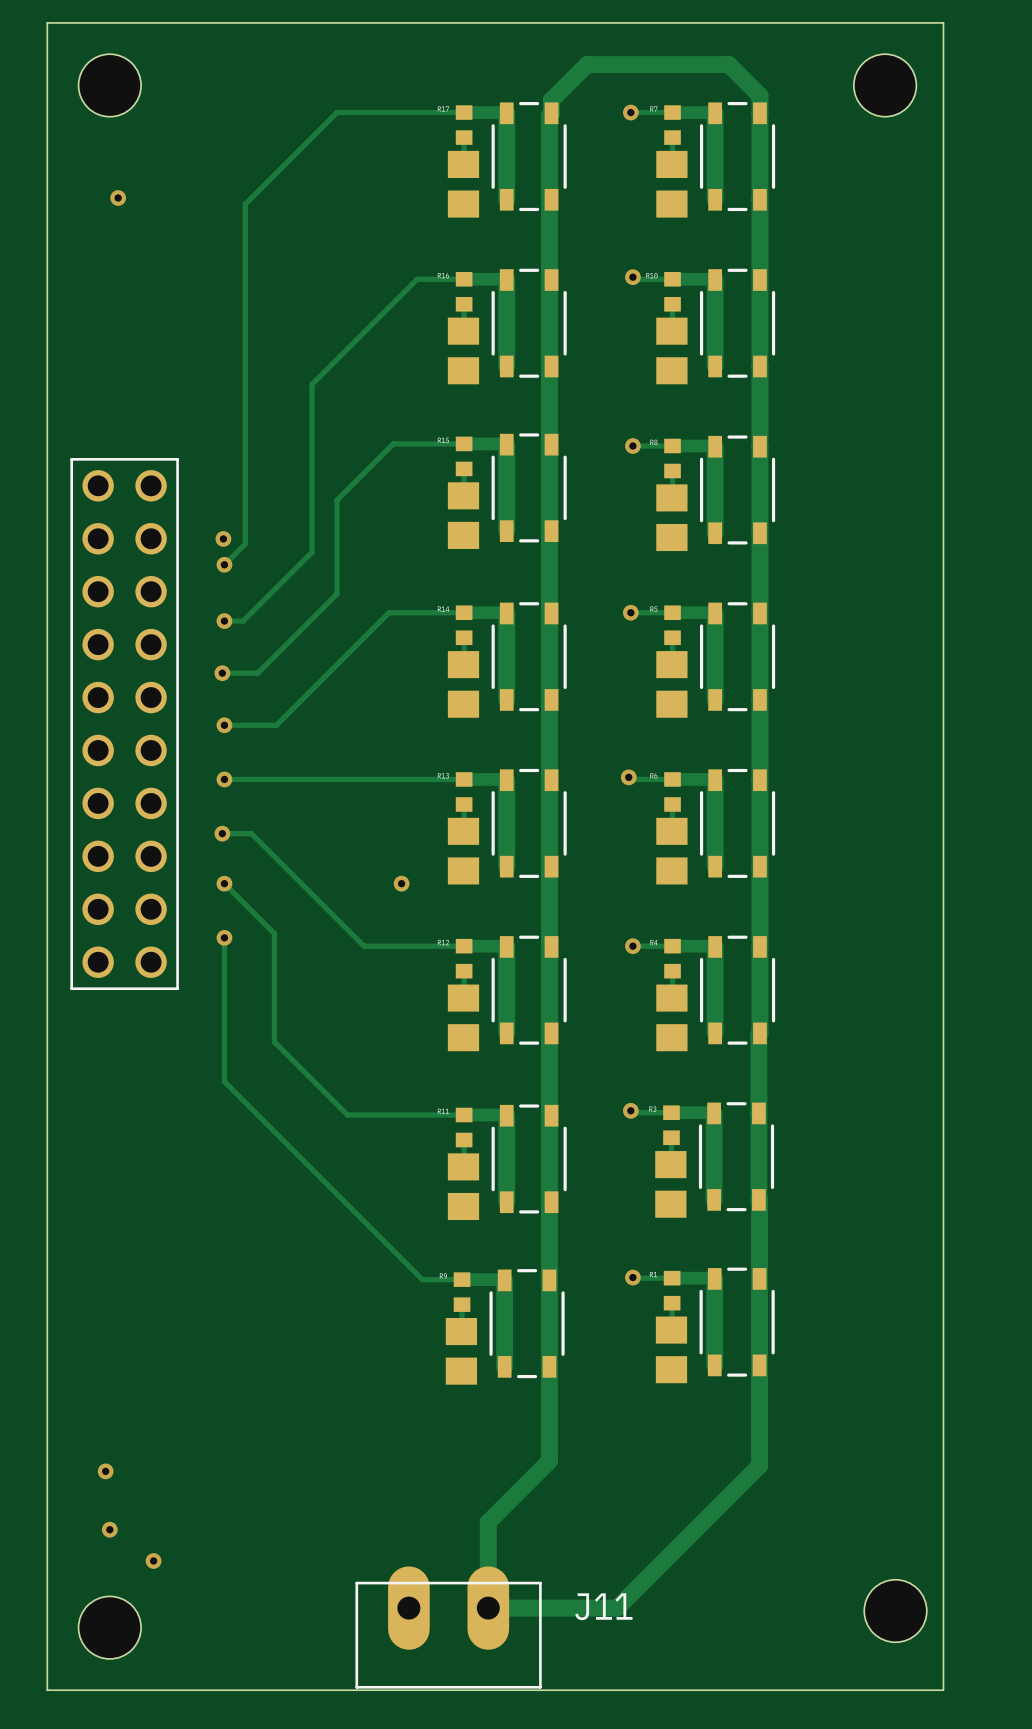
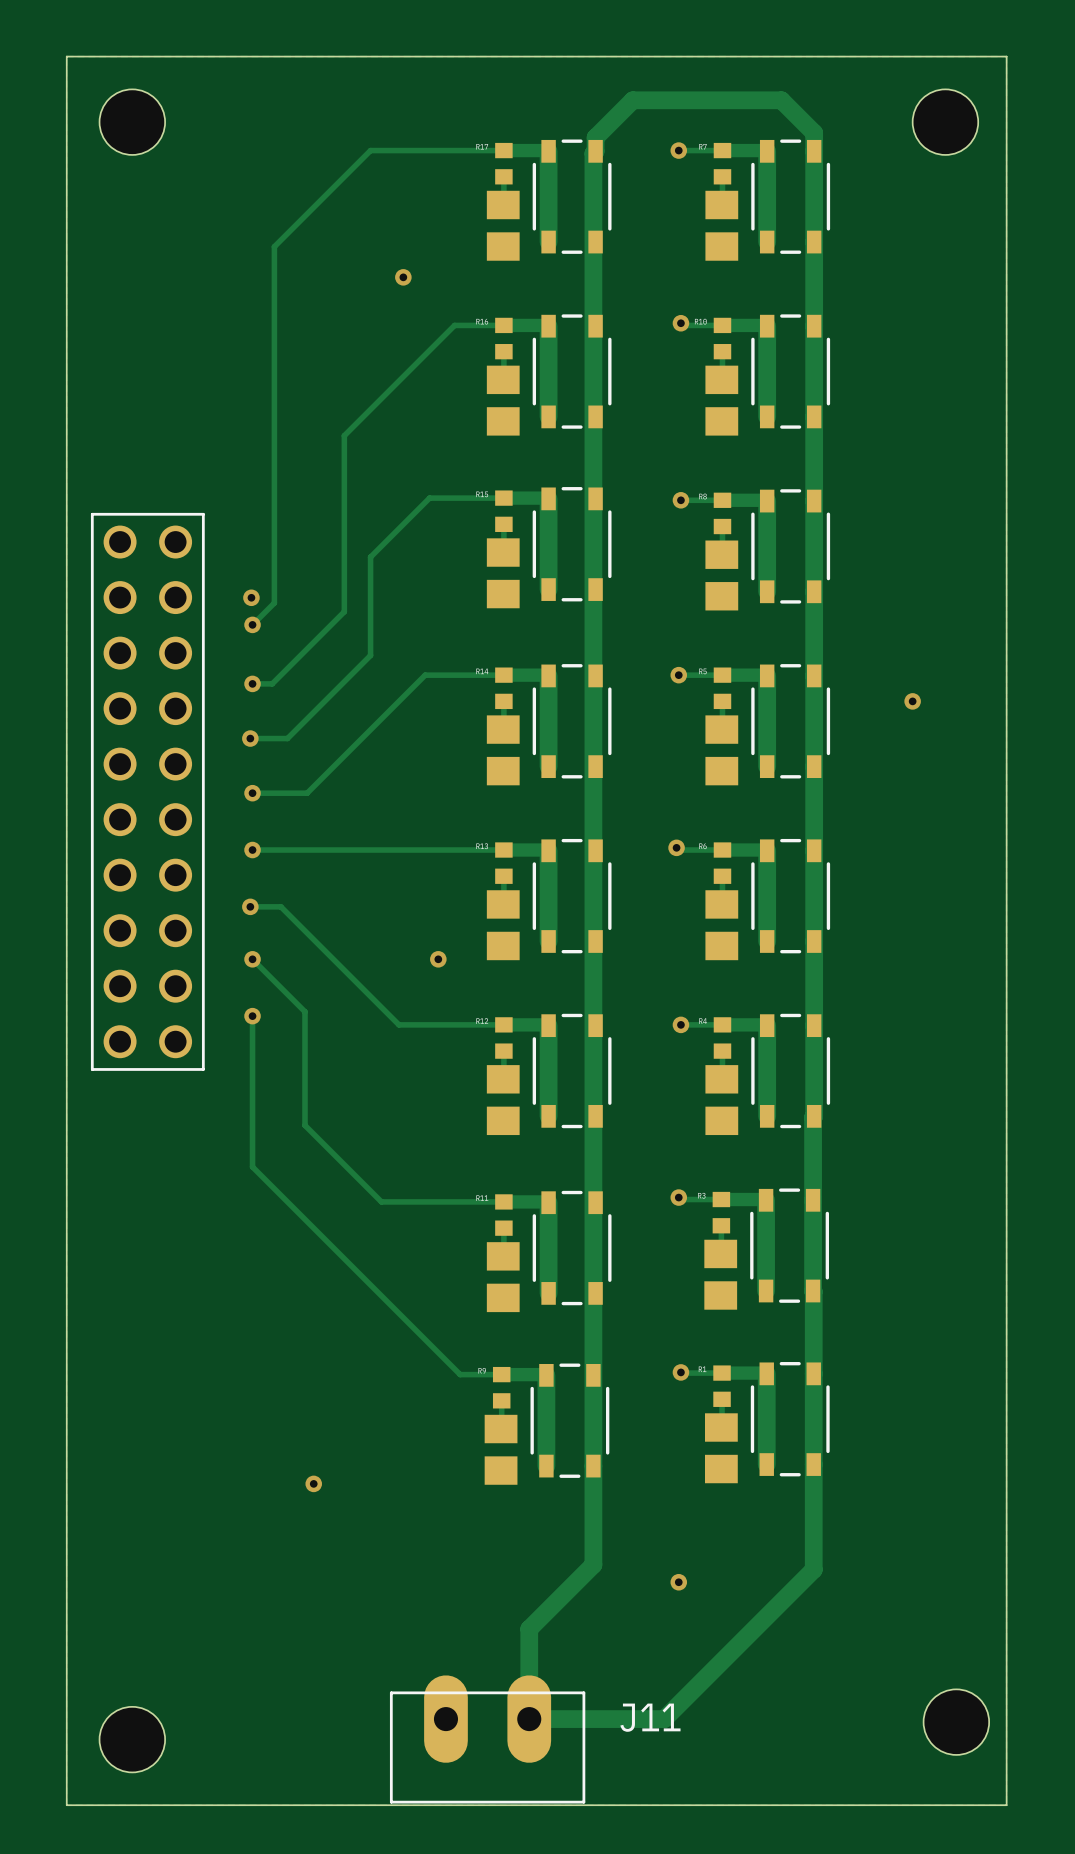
via: (118, 198) -> none
via: none -> (403, 277)
via: none -> (912, 701)
via: none -> (313, 1483)
via: (105, 1471) -> none
via: none -> (678, 1582)
via: (109, 1529) -> none
via: (153, 1560) -> none

